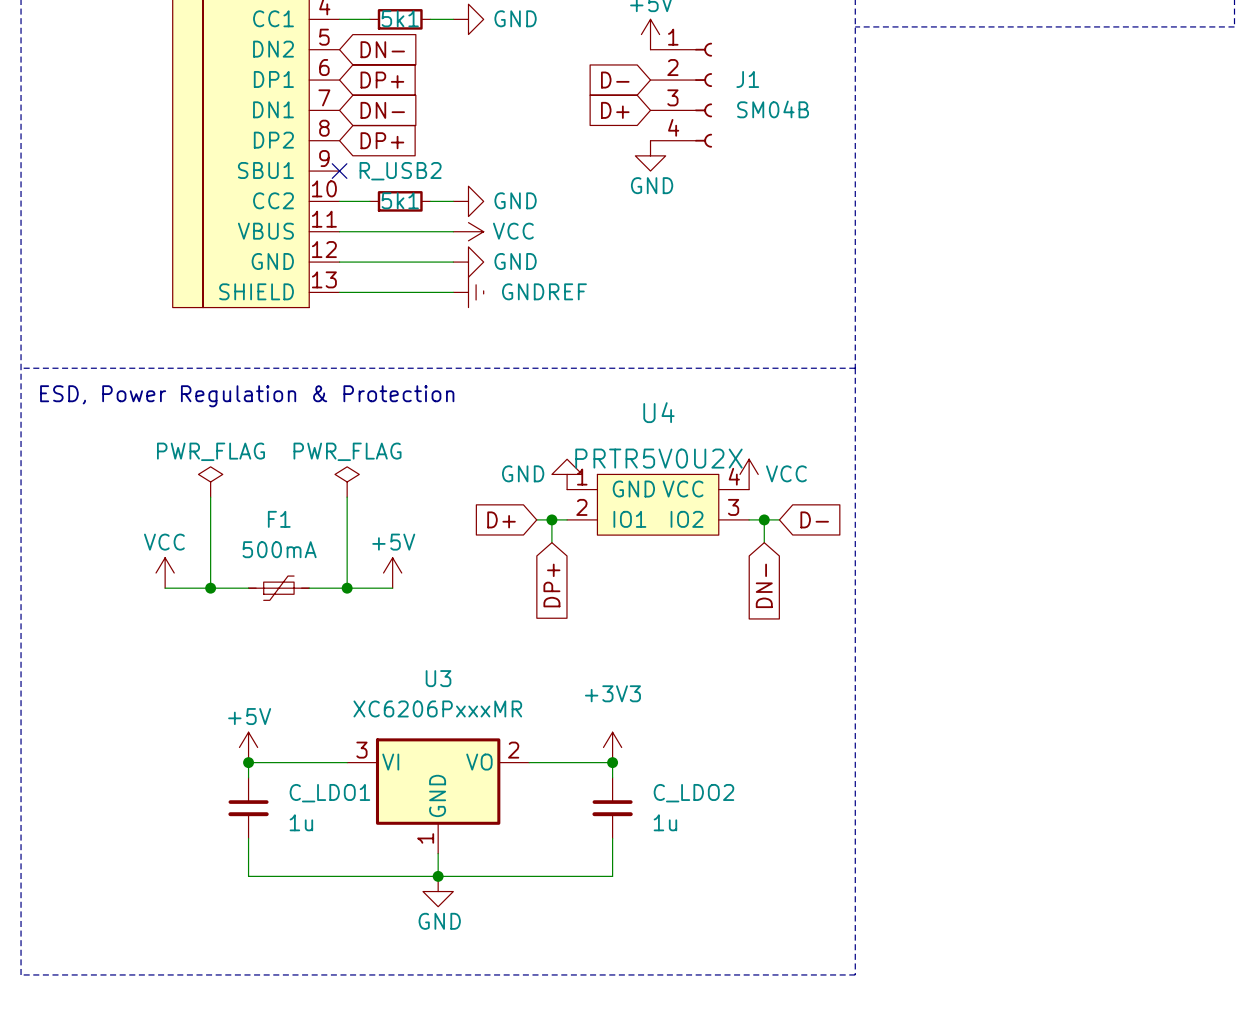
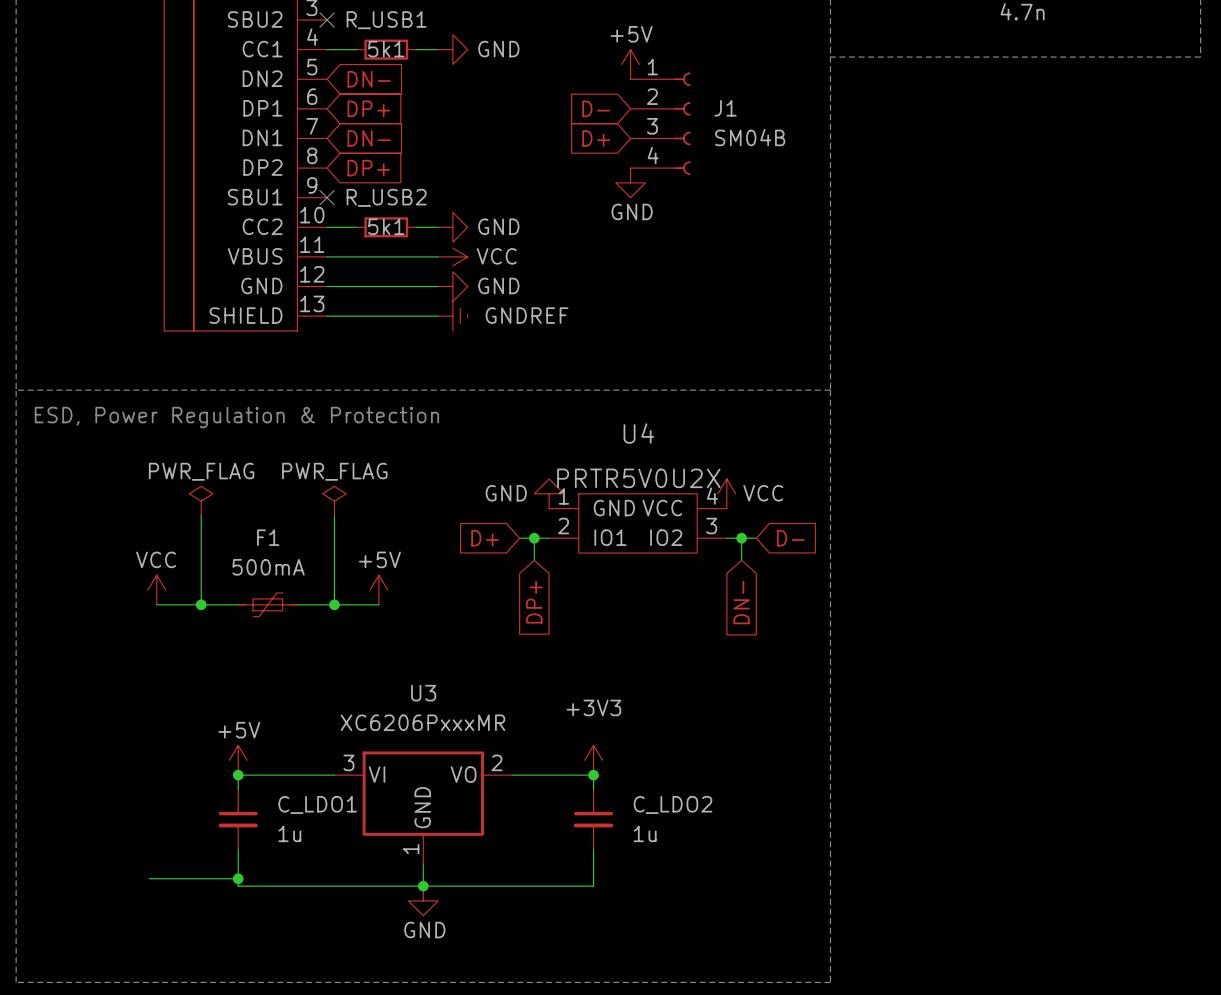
wire: none -> (149, 878) (238, 878)
junction: none -> (238, 878)

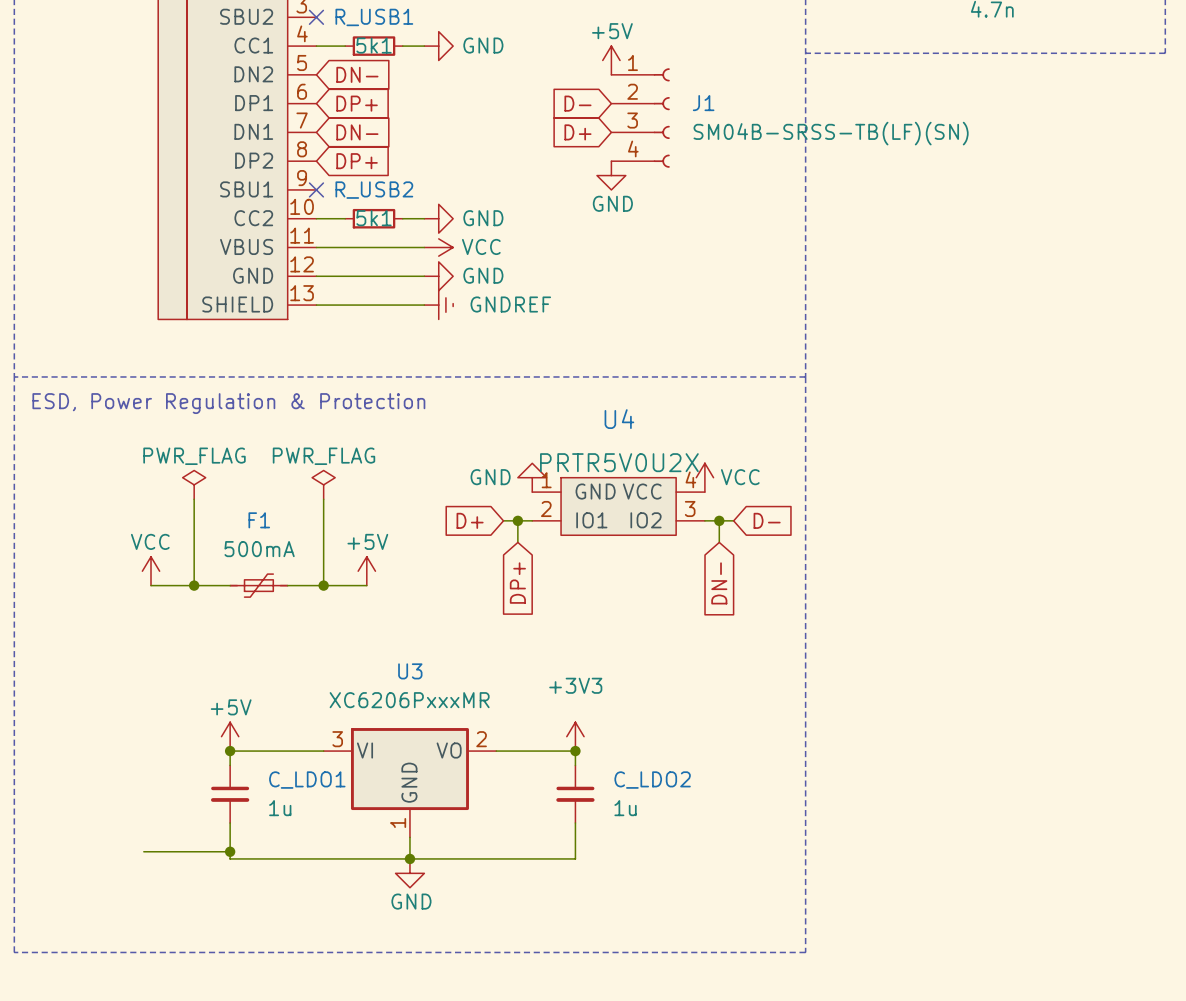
J1 value: SM04B (750, 137) -> SM04B-SRSS-TB(LF)(SN) (831, 133)

